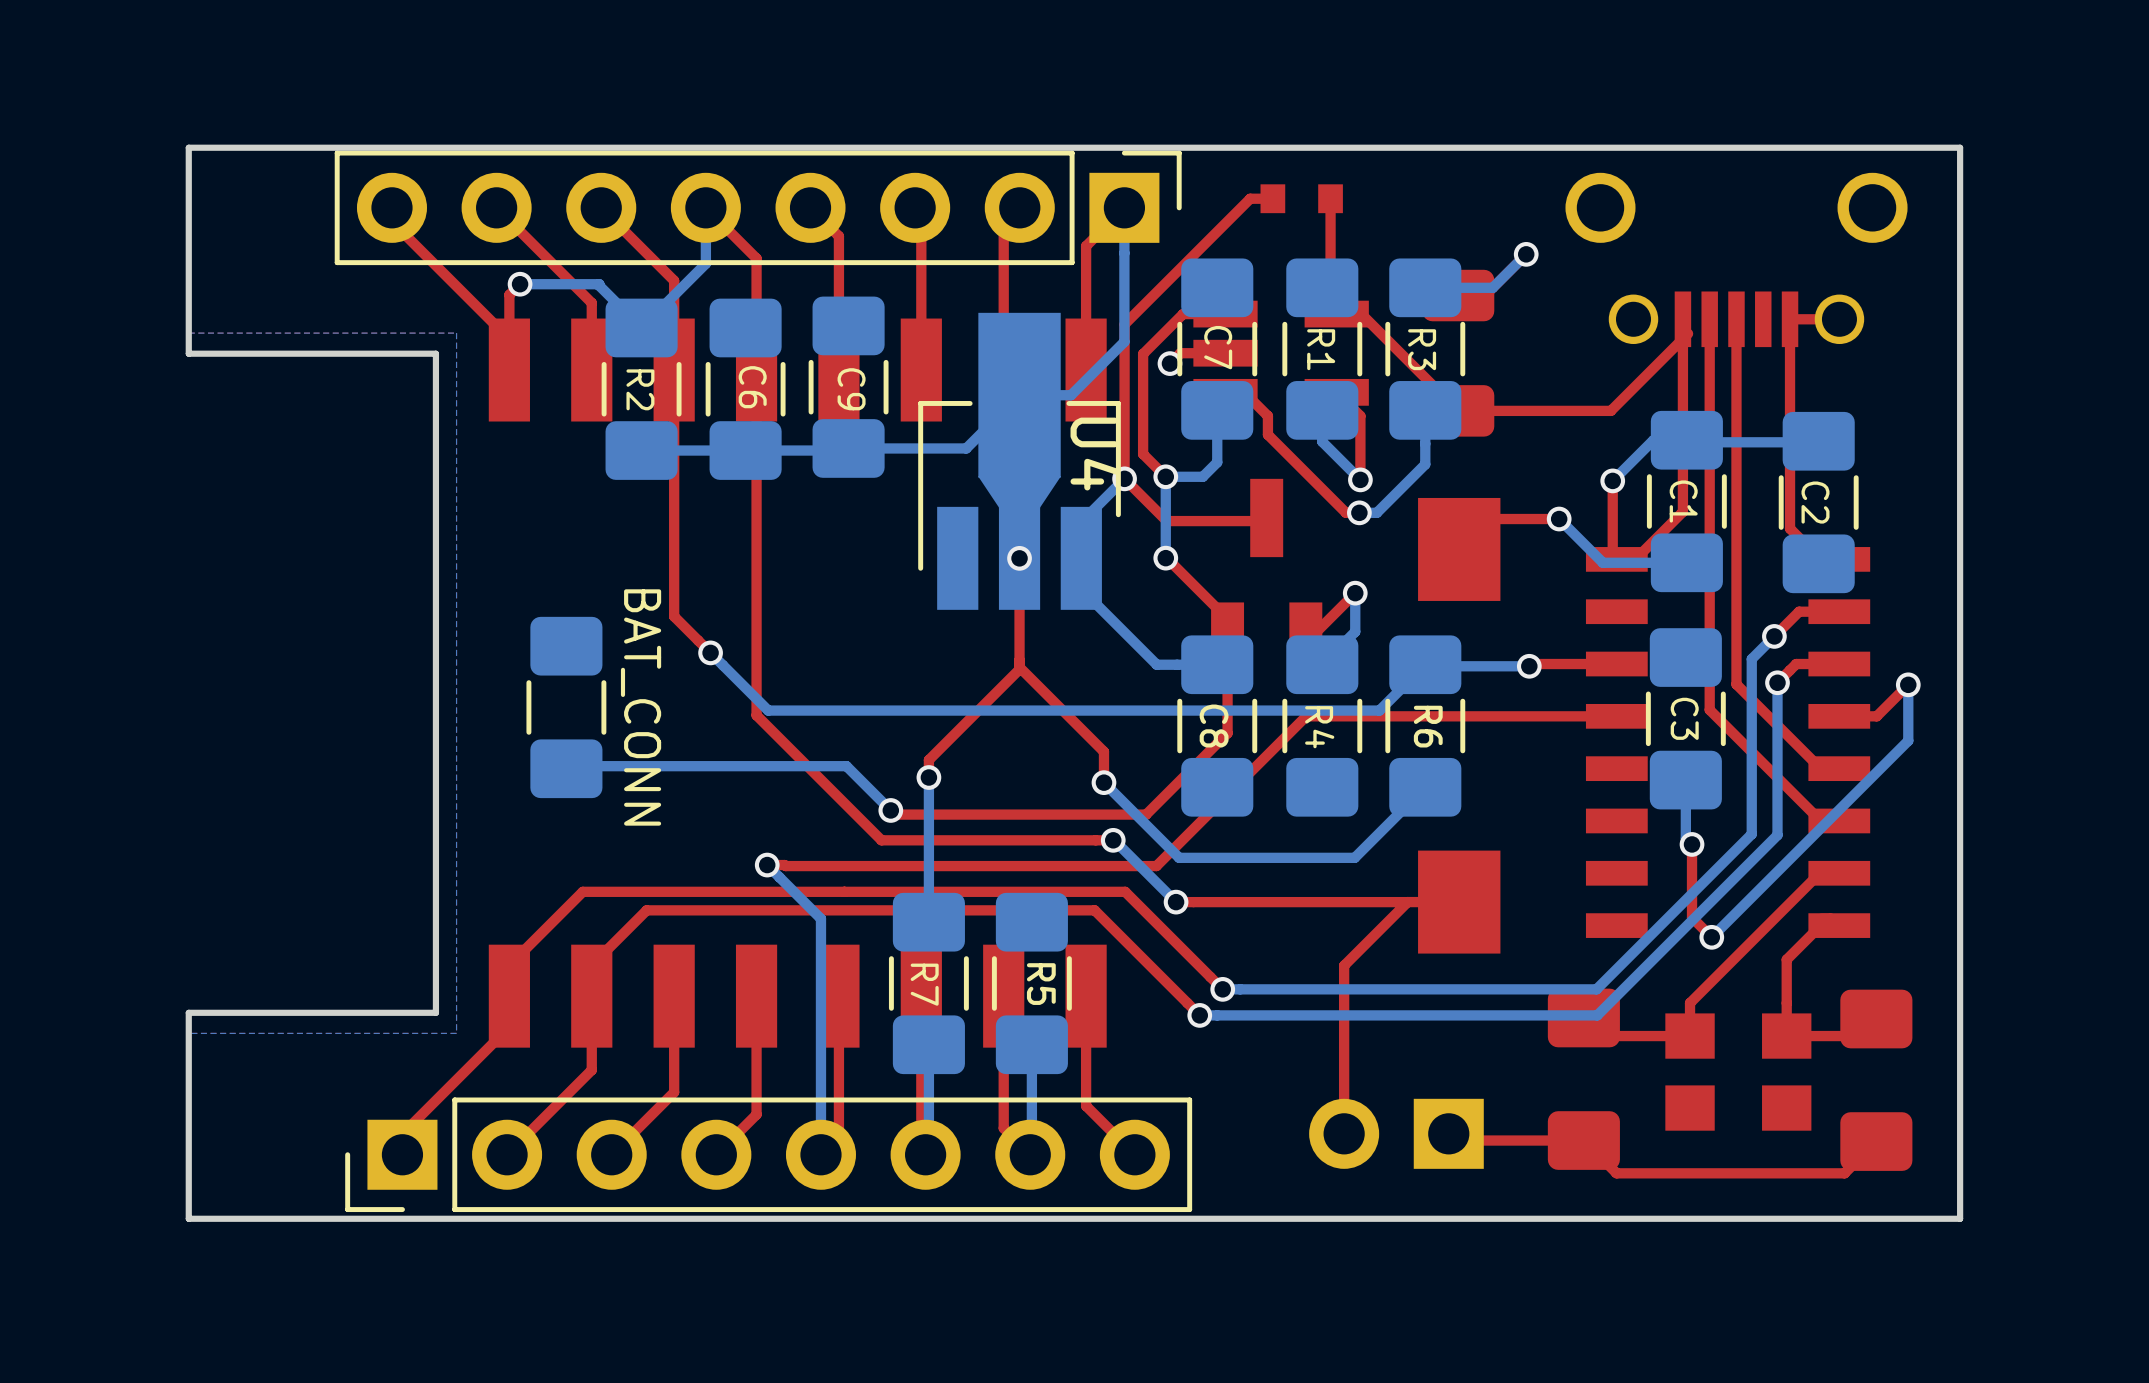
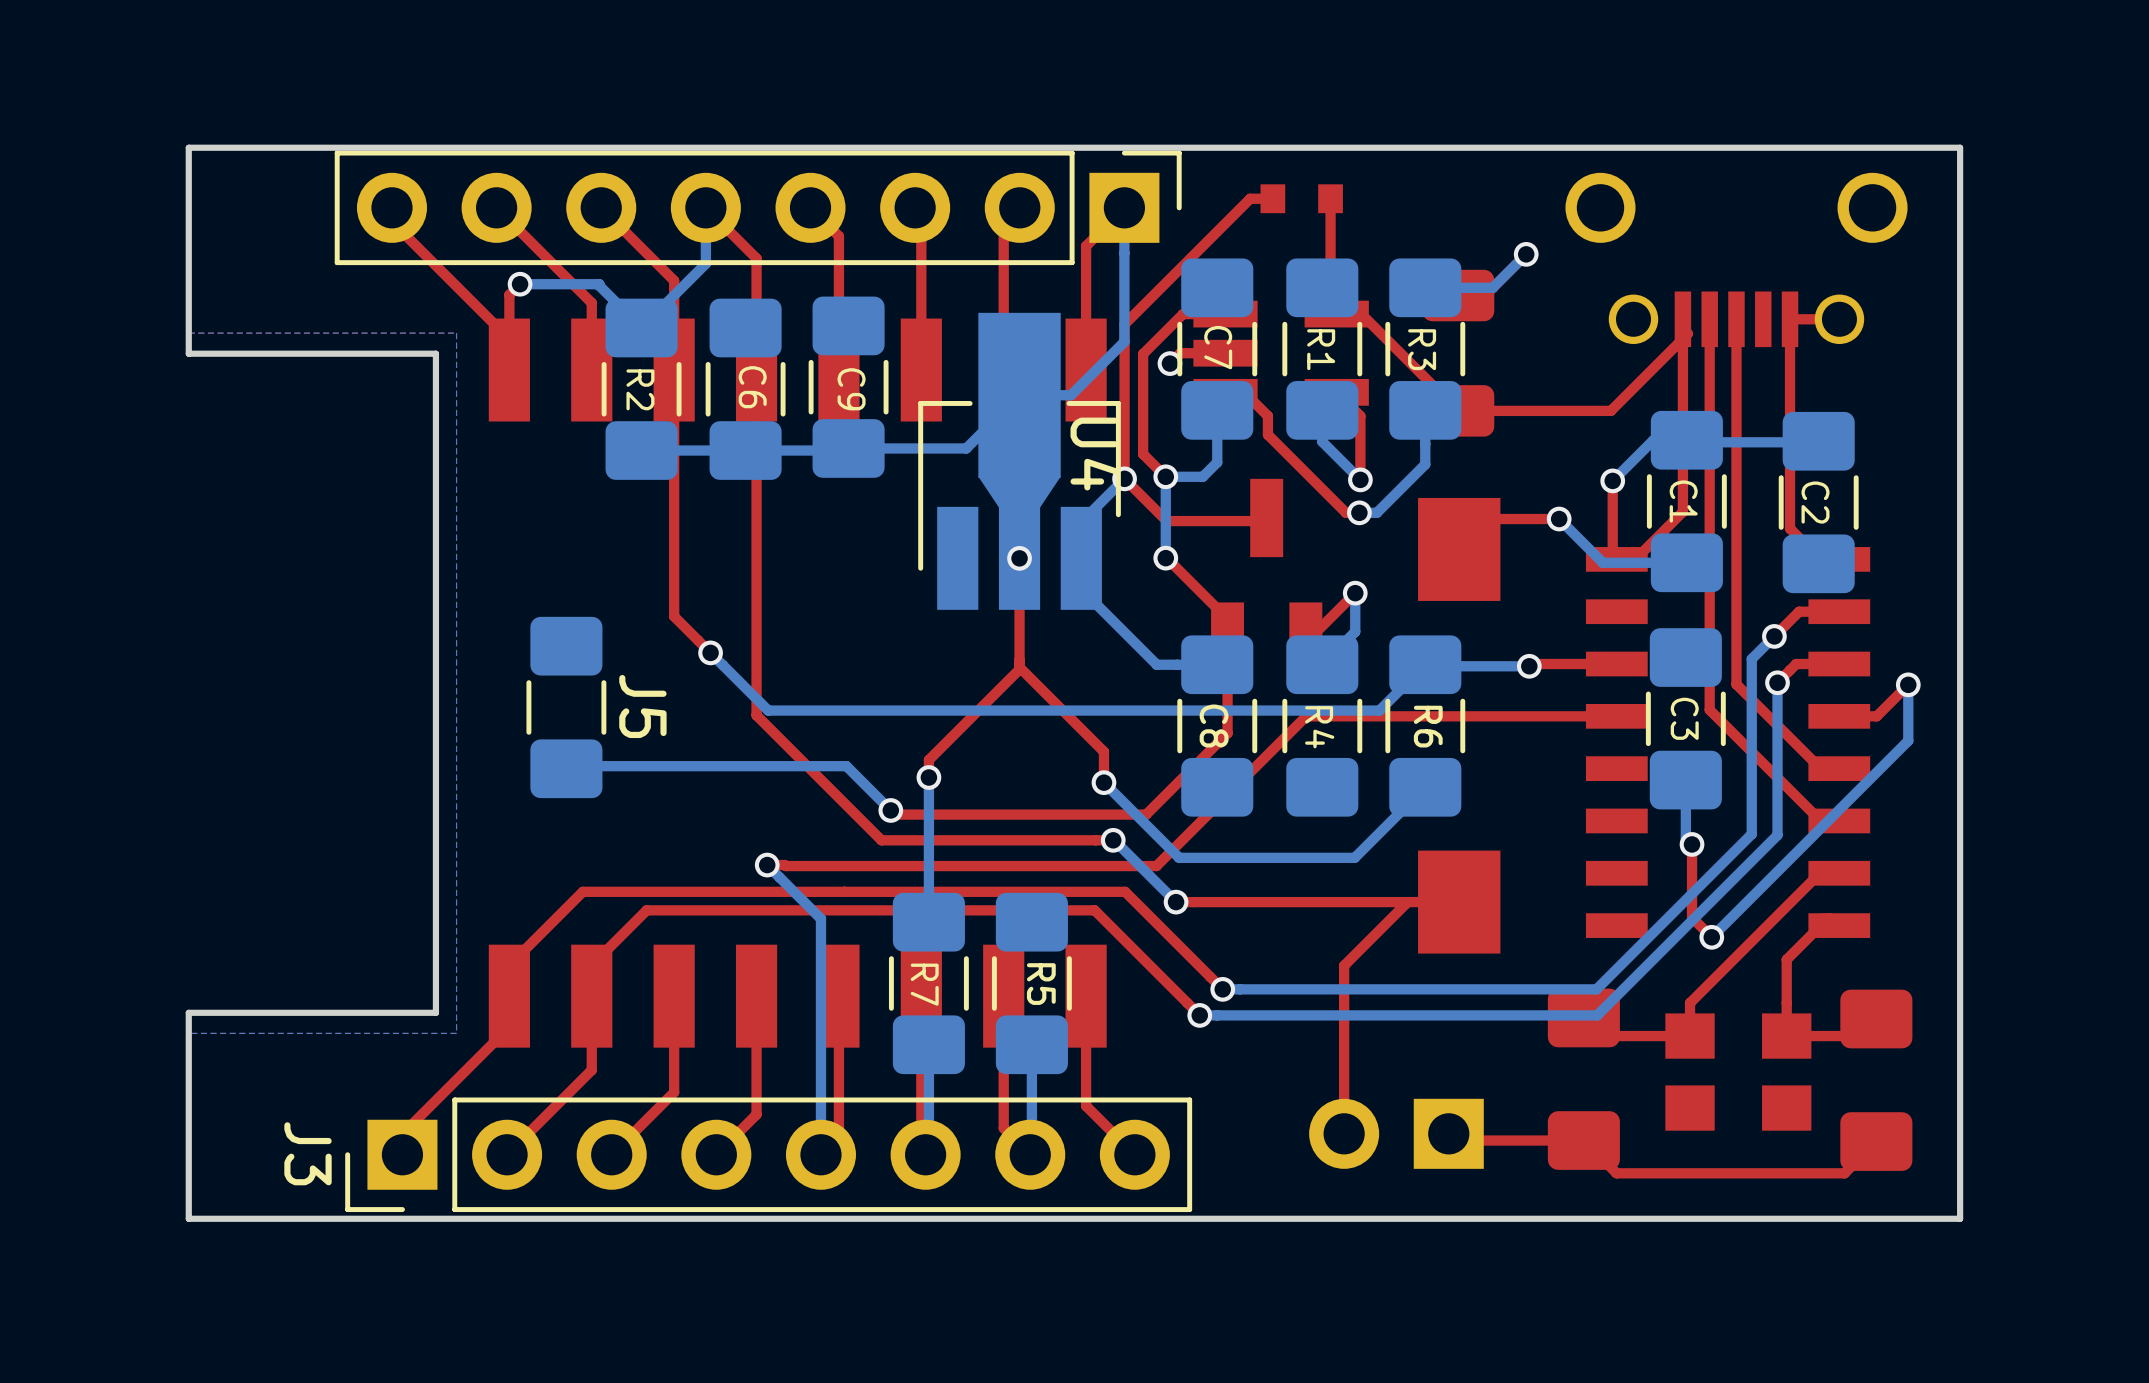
BAT_CONN name: BAT_CONN (641, 707) -> J5 (642, 706)
J3 name: none -> J3 (308, 1153)

